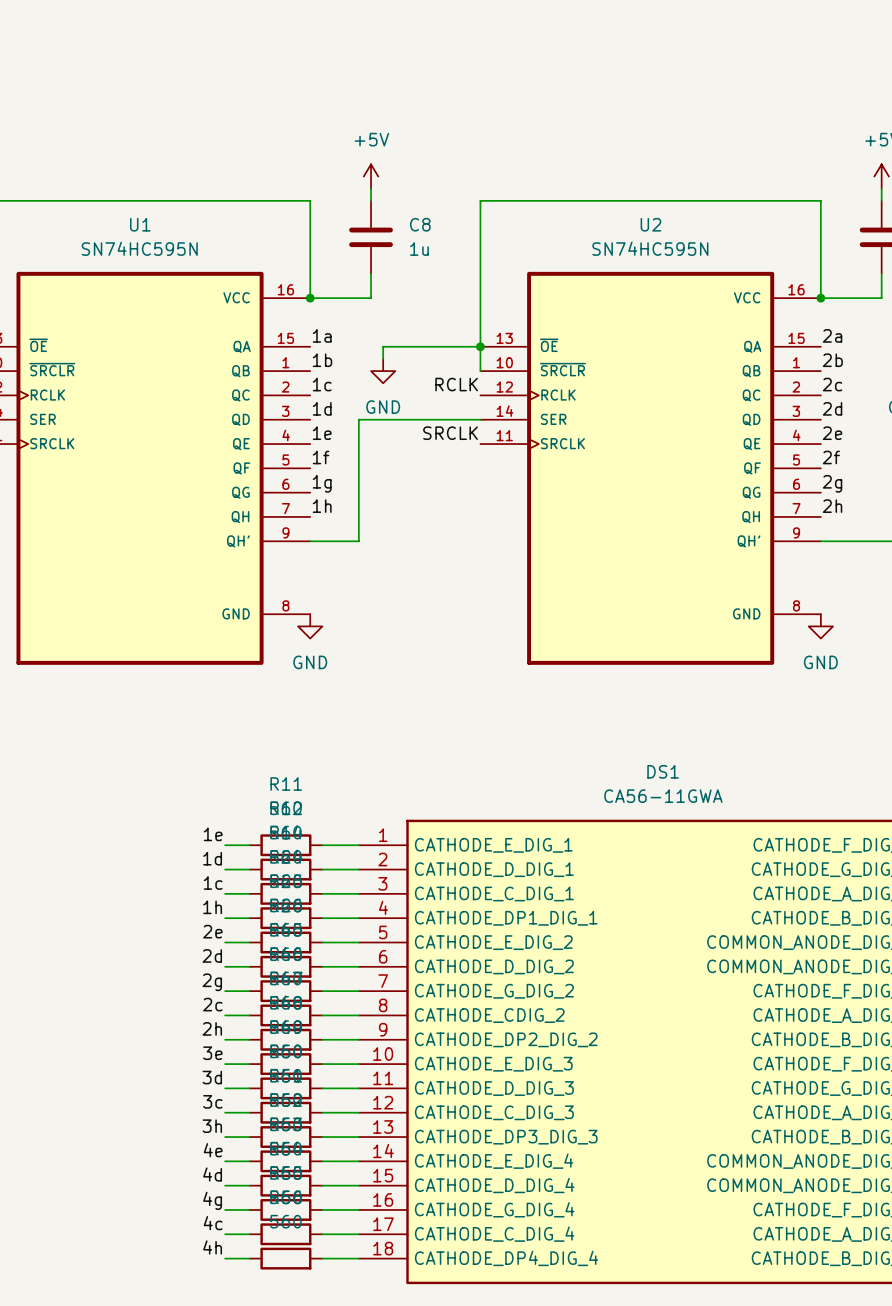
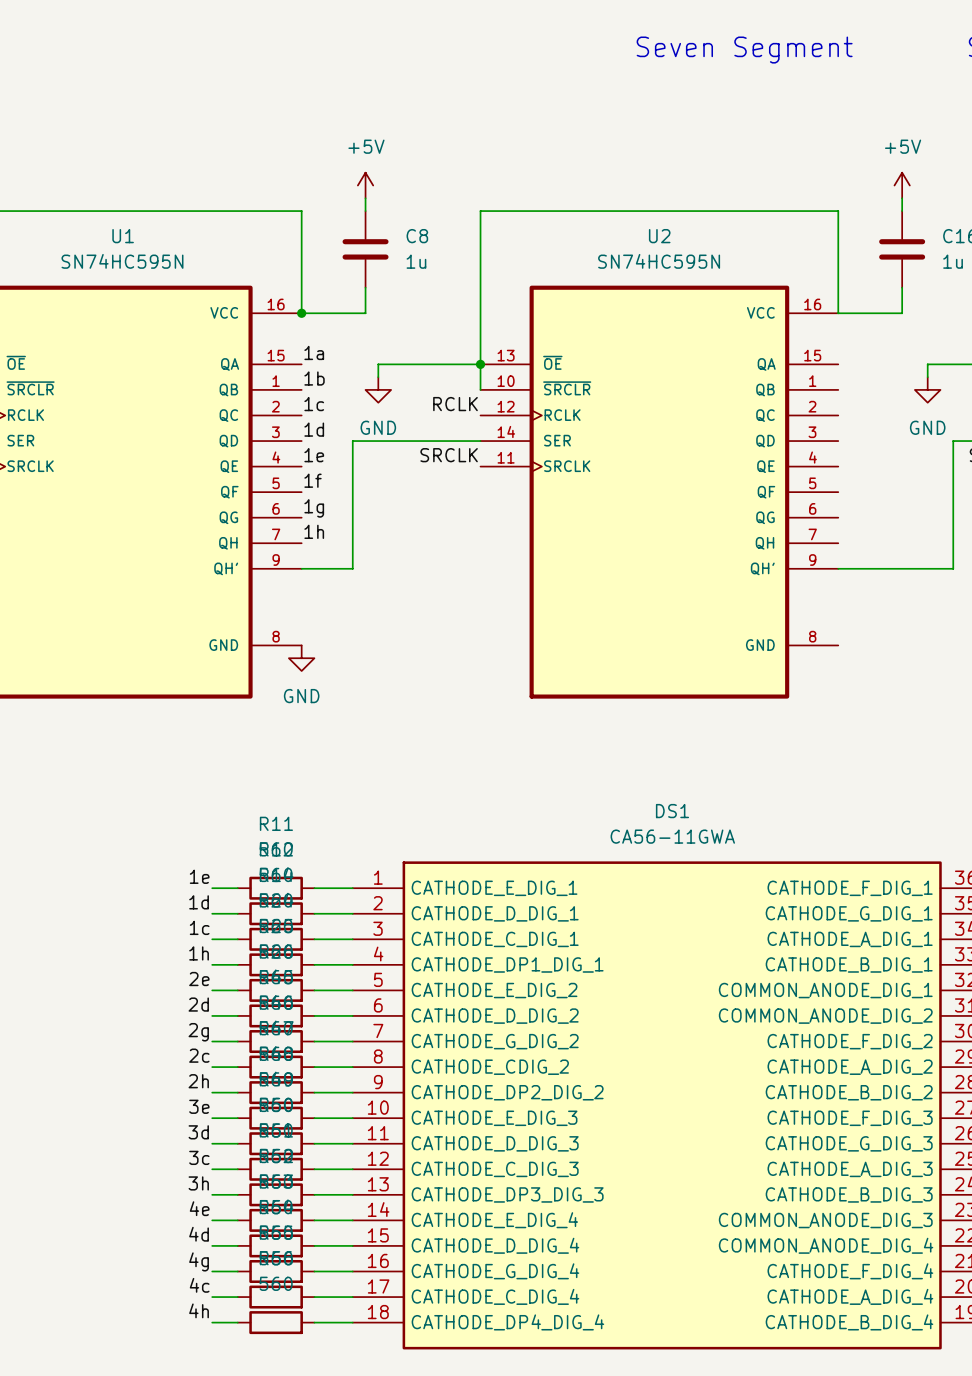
text: none -> Seven Segment (744, 50)
junction: (820, 298) -> none
label: 2a (832, 335) -> none
label: 2b (832, 360) -> none
label: 2c (832, 384) -> none
label: 2d (832, 408) -> none
label: 2e (832, 433) -> none
label: 2f (831, 457) -> none
label: 2g (832, 483) -> none
label: 2h (832, 506) -> none
power symbol: GND (820, 626) -> none

